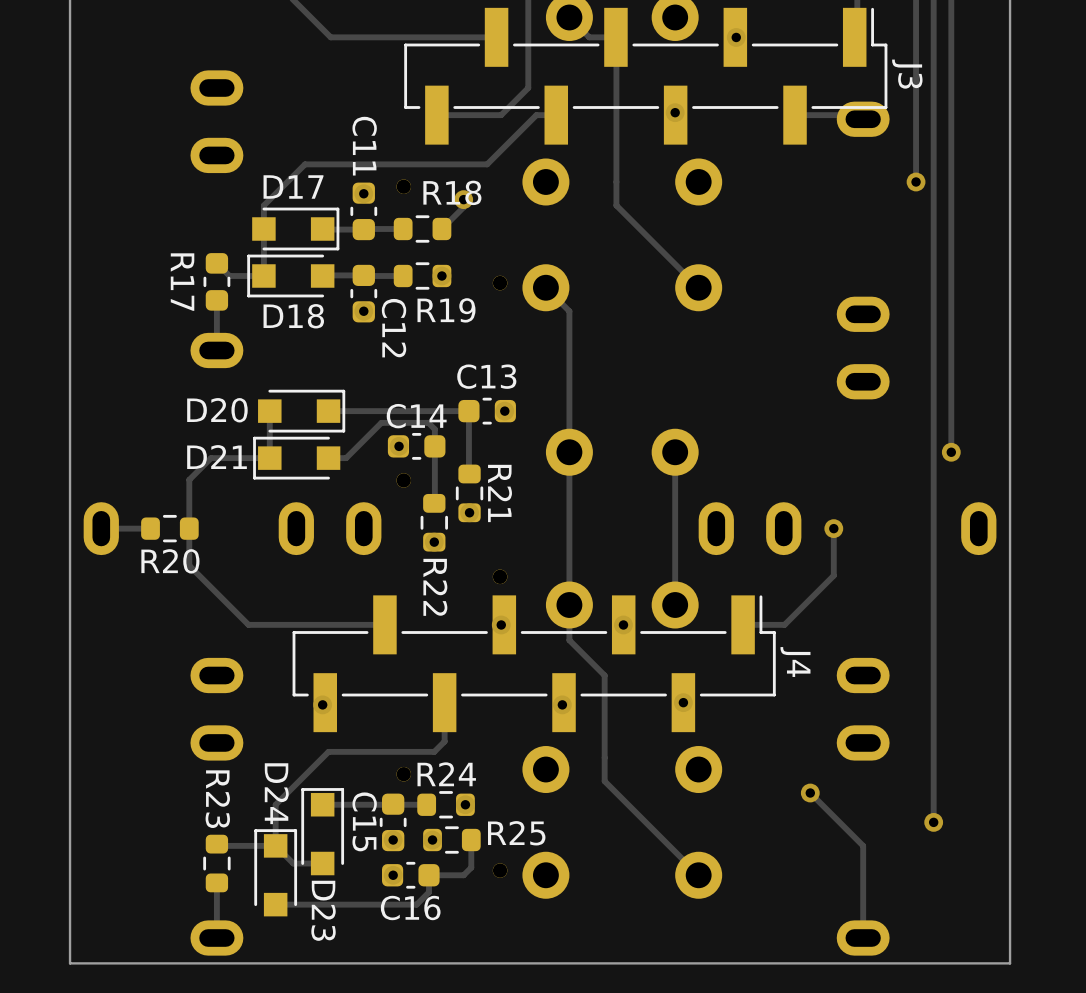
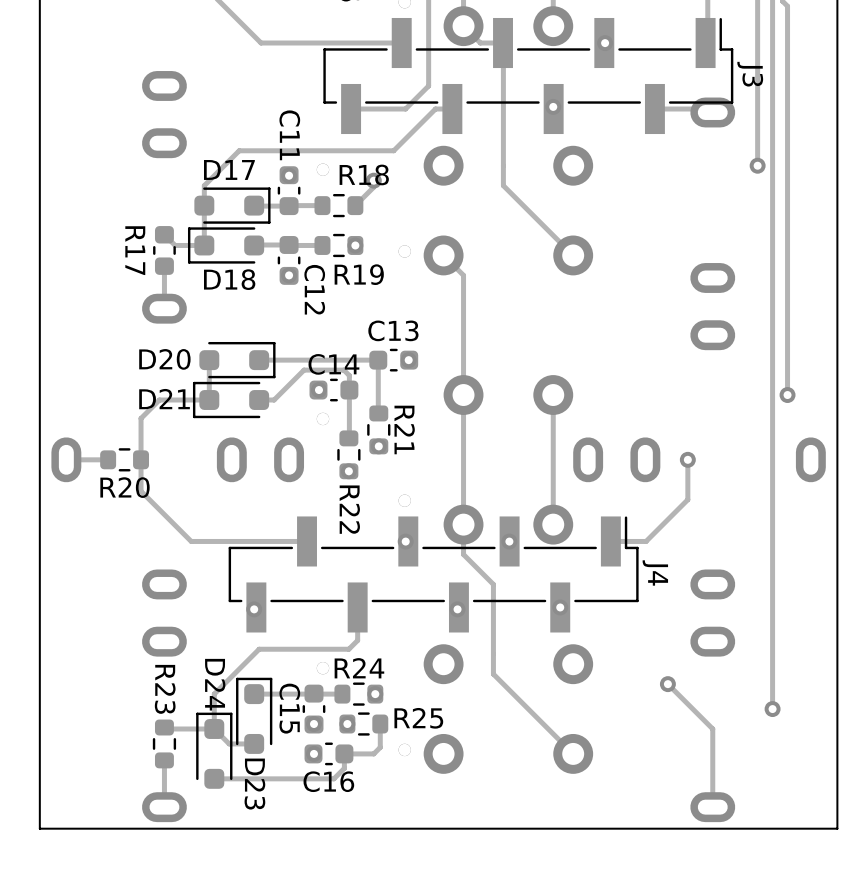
D17 footprint: [252, 207, 340, 251] -> [194, 187, 271, 224]
D18 footprint: [247, 254, 335, 298] -> [187, 227, 265, 264]
D20 footprint: [258, 389, 346, 433] -> [199, 341, 276, 379]
D21 footprint: [253, 436, 341, 480] -> [192, 381, 270, 419]
D23 footprint: [301, 788, 345, 876] -> [236, 677, 273, 754]
D24 footprint: [254, 829, 298, 917] -> [196, 712, 233, 789]

